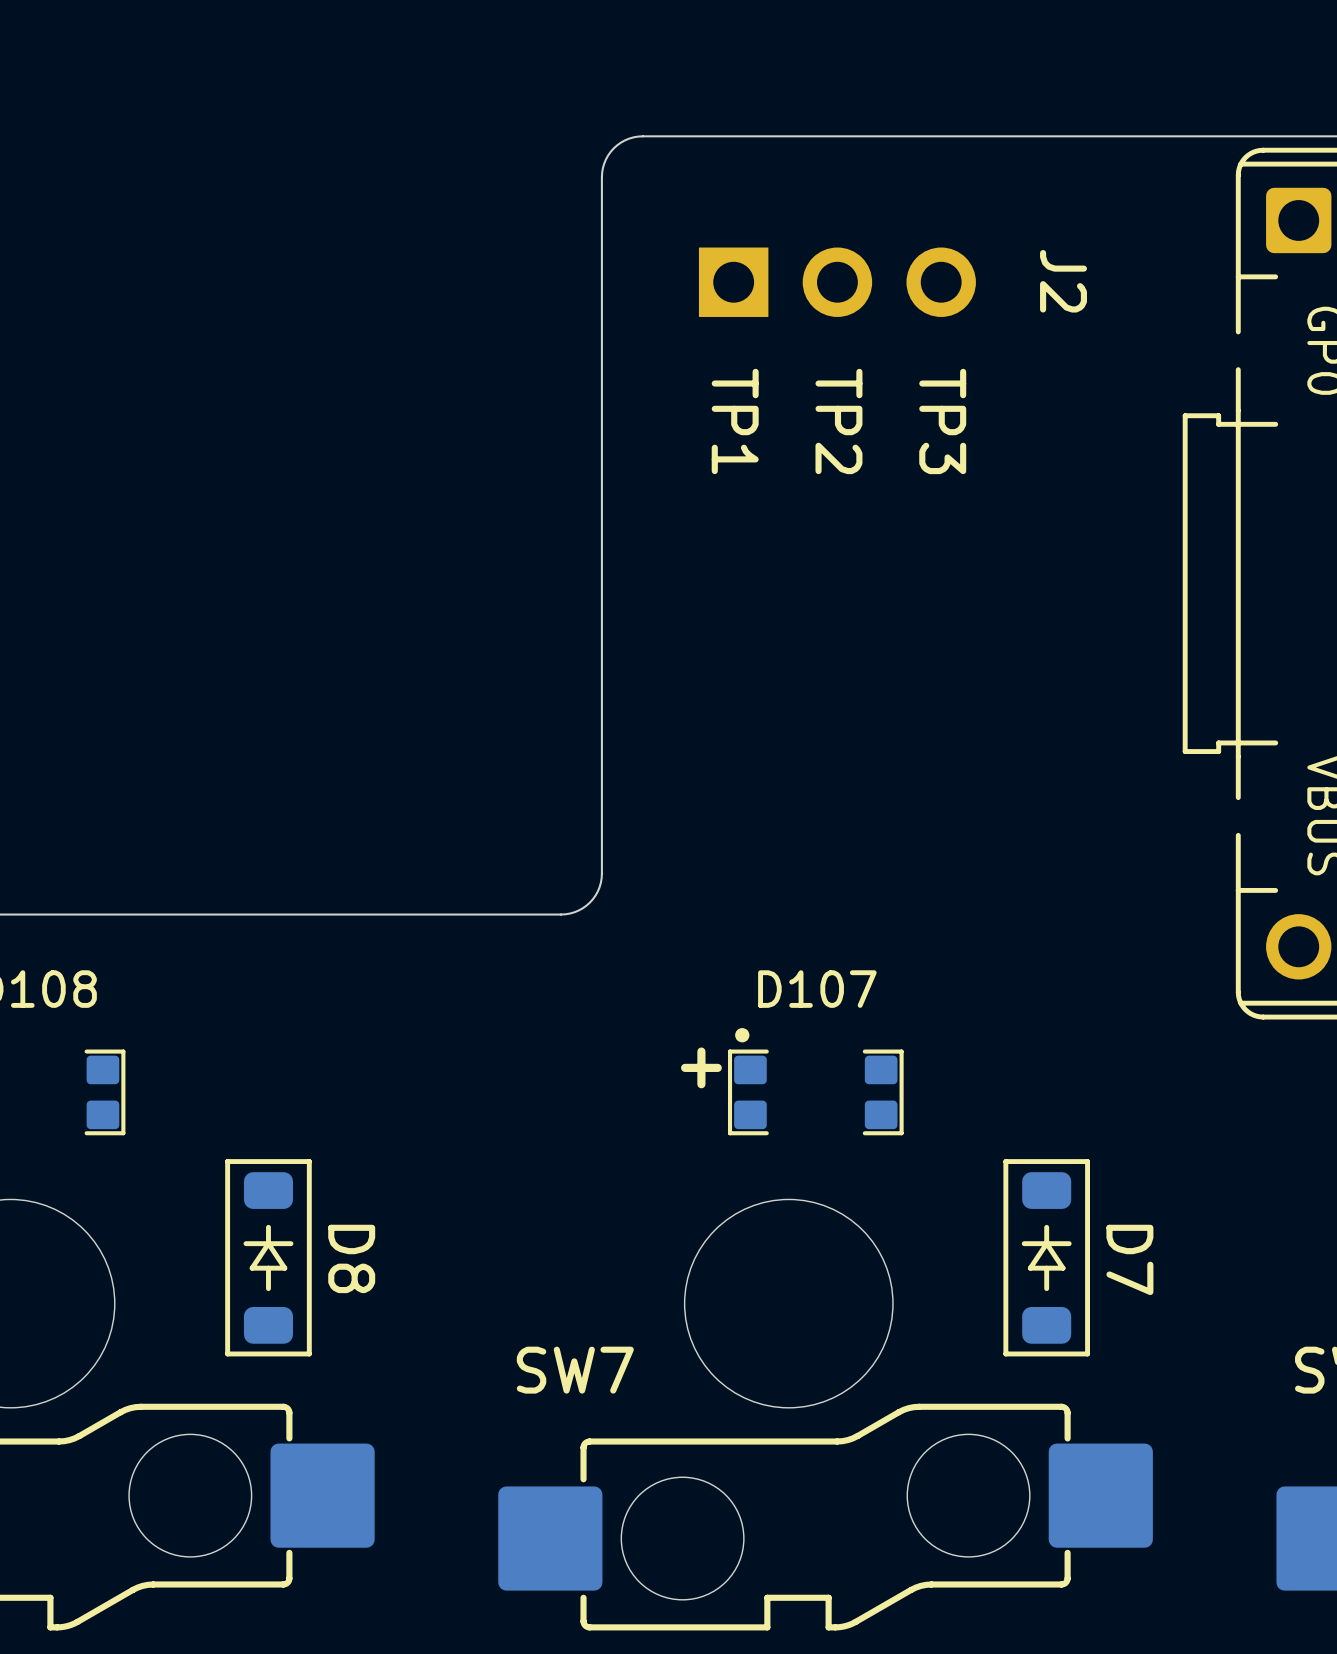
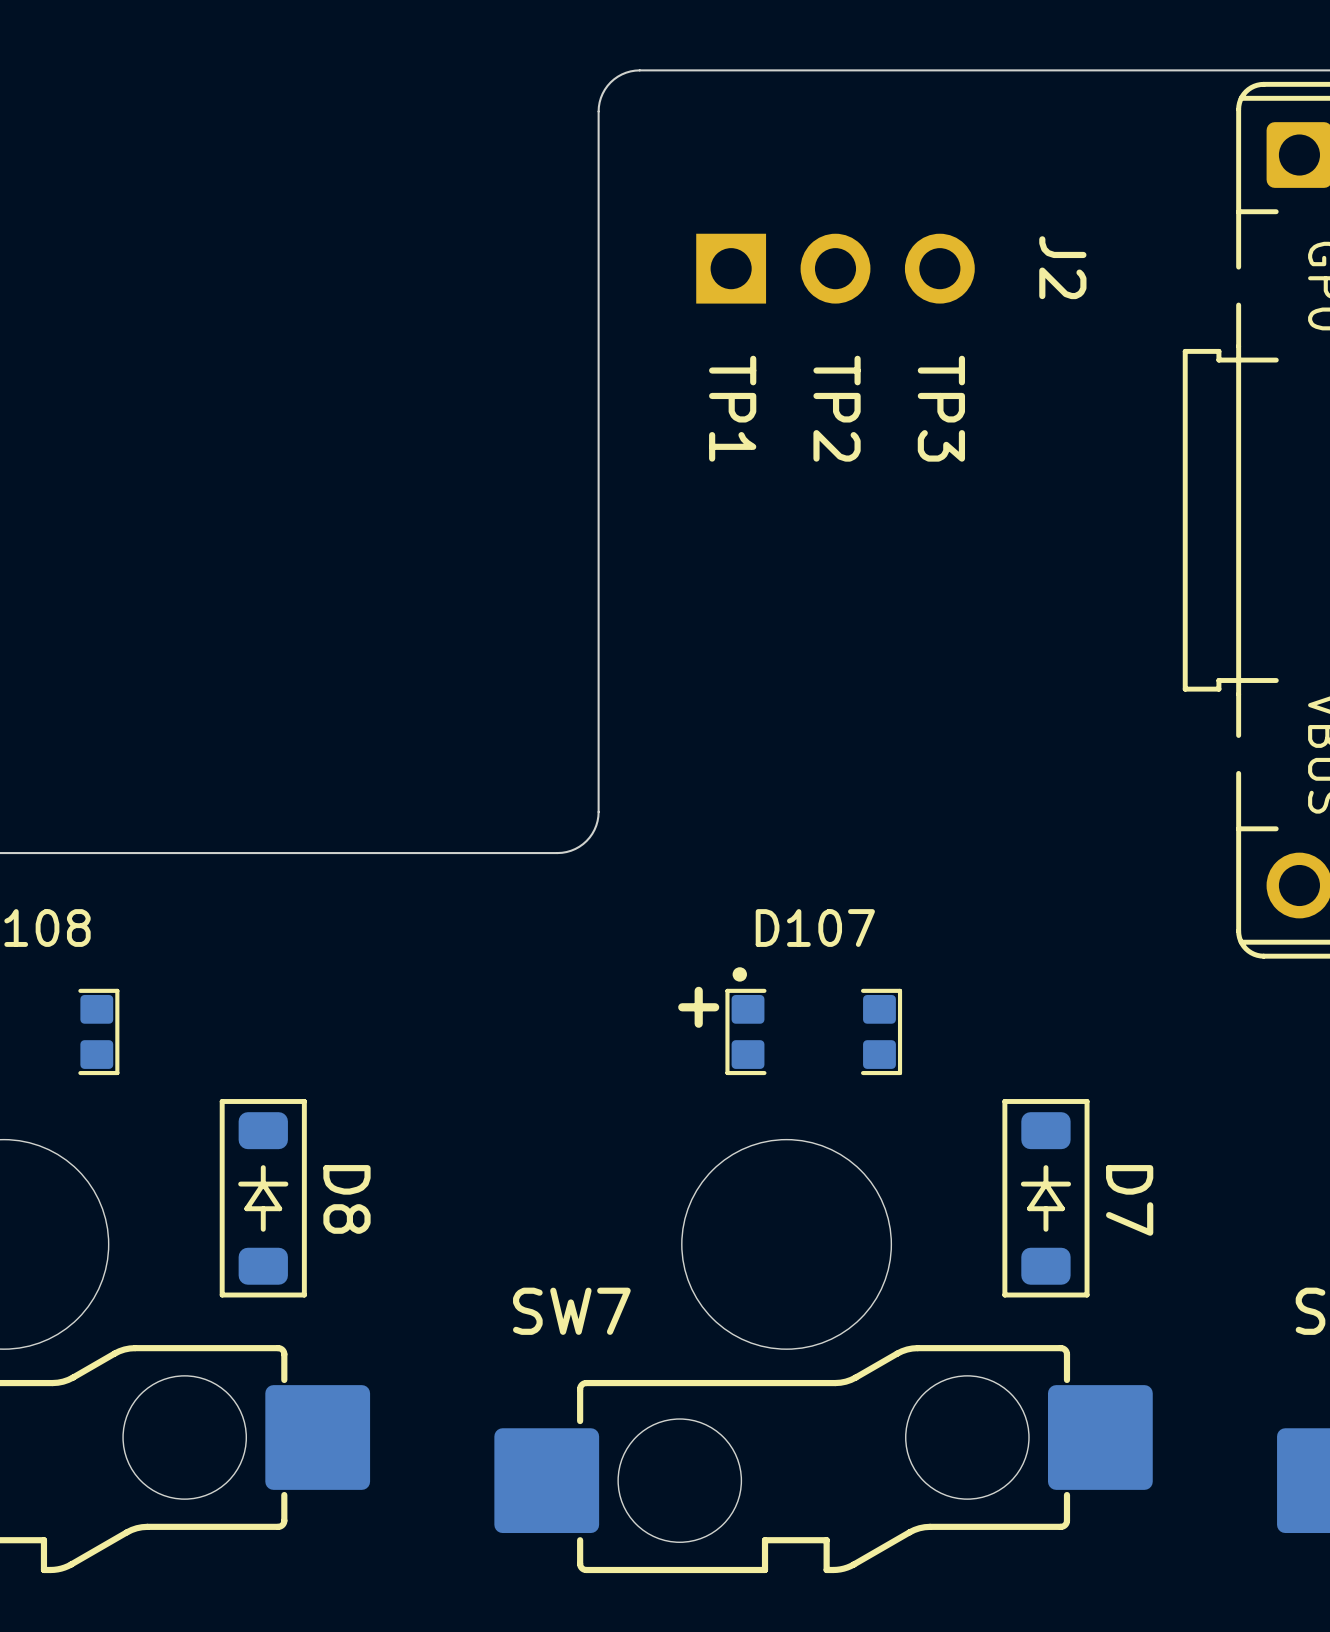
J2 position: (837, 282) -> (835, 268)

